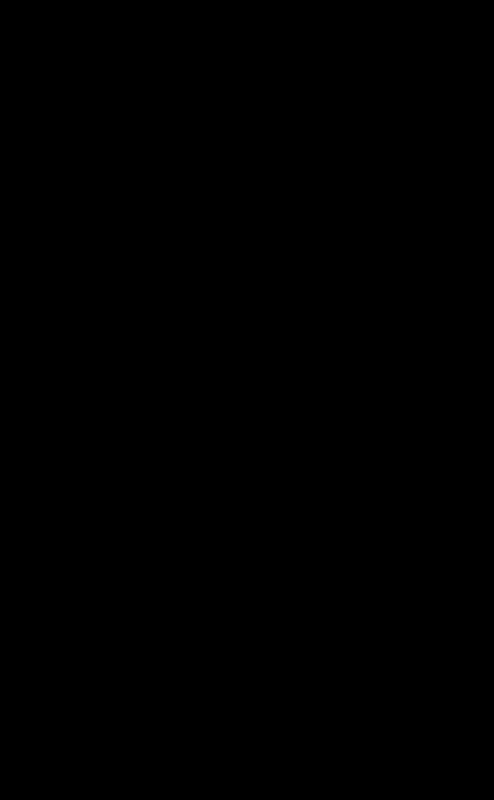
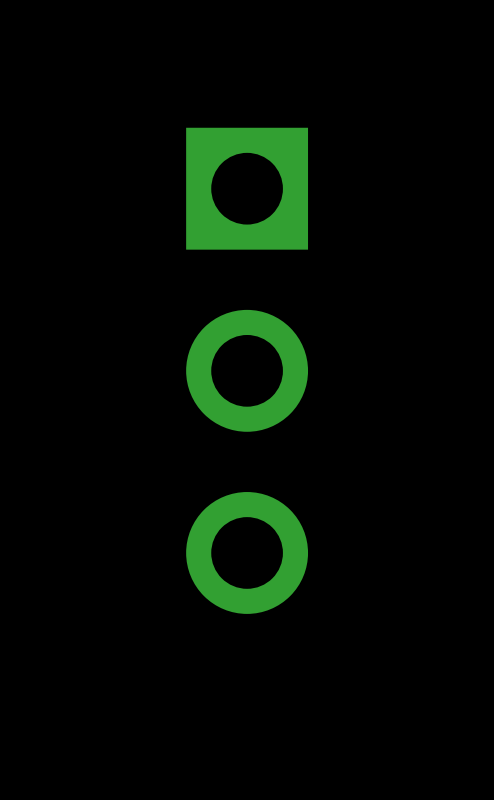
part: none -> (247, 370)

